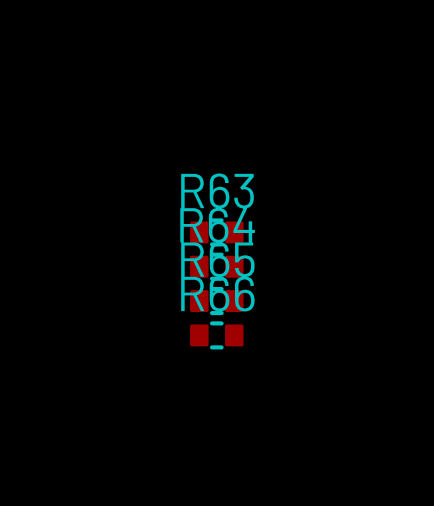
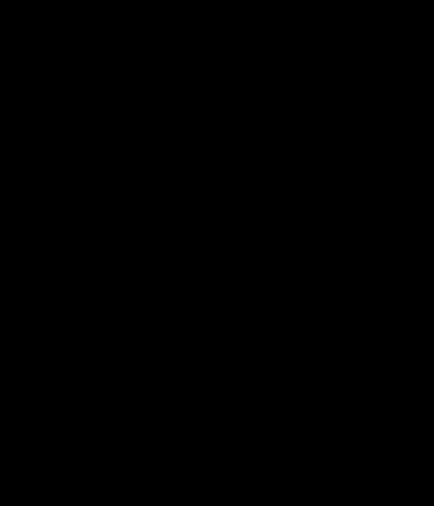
R63: (216, 232) -> none
R64: (216, 266) -> none
R65: (216, 301) -> none
R66: (216, 335) -> none

